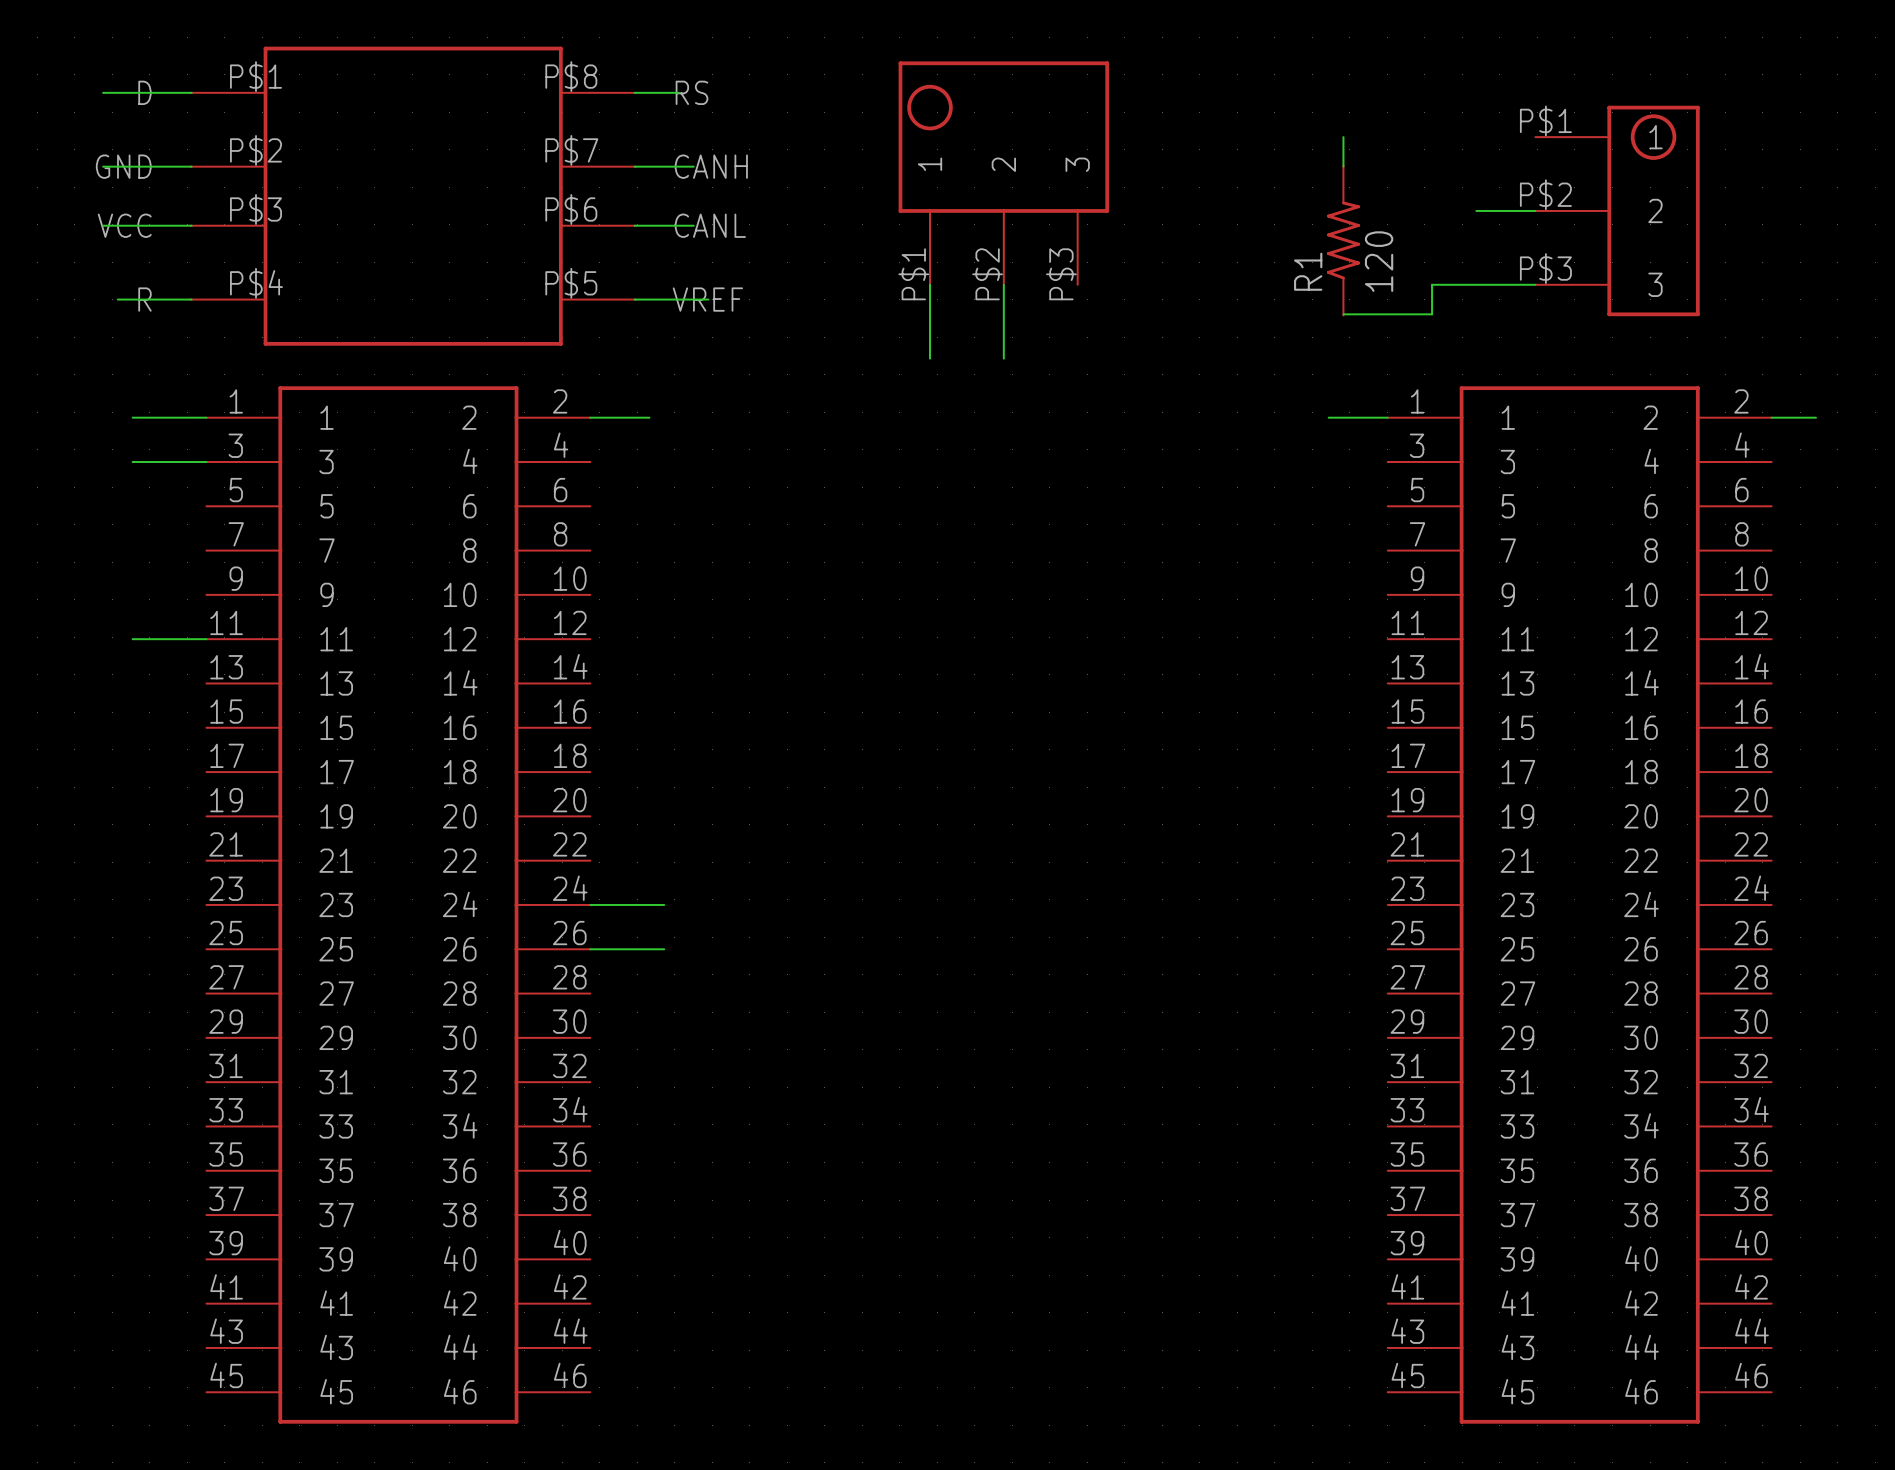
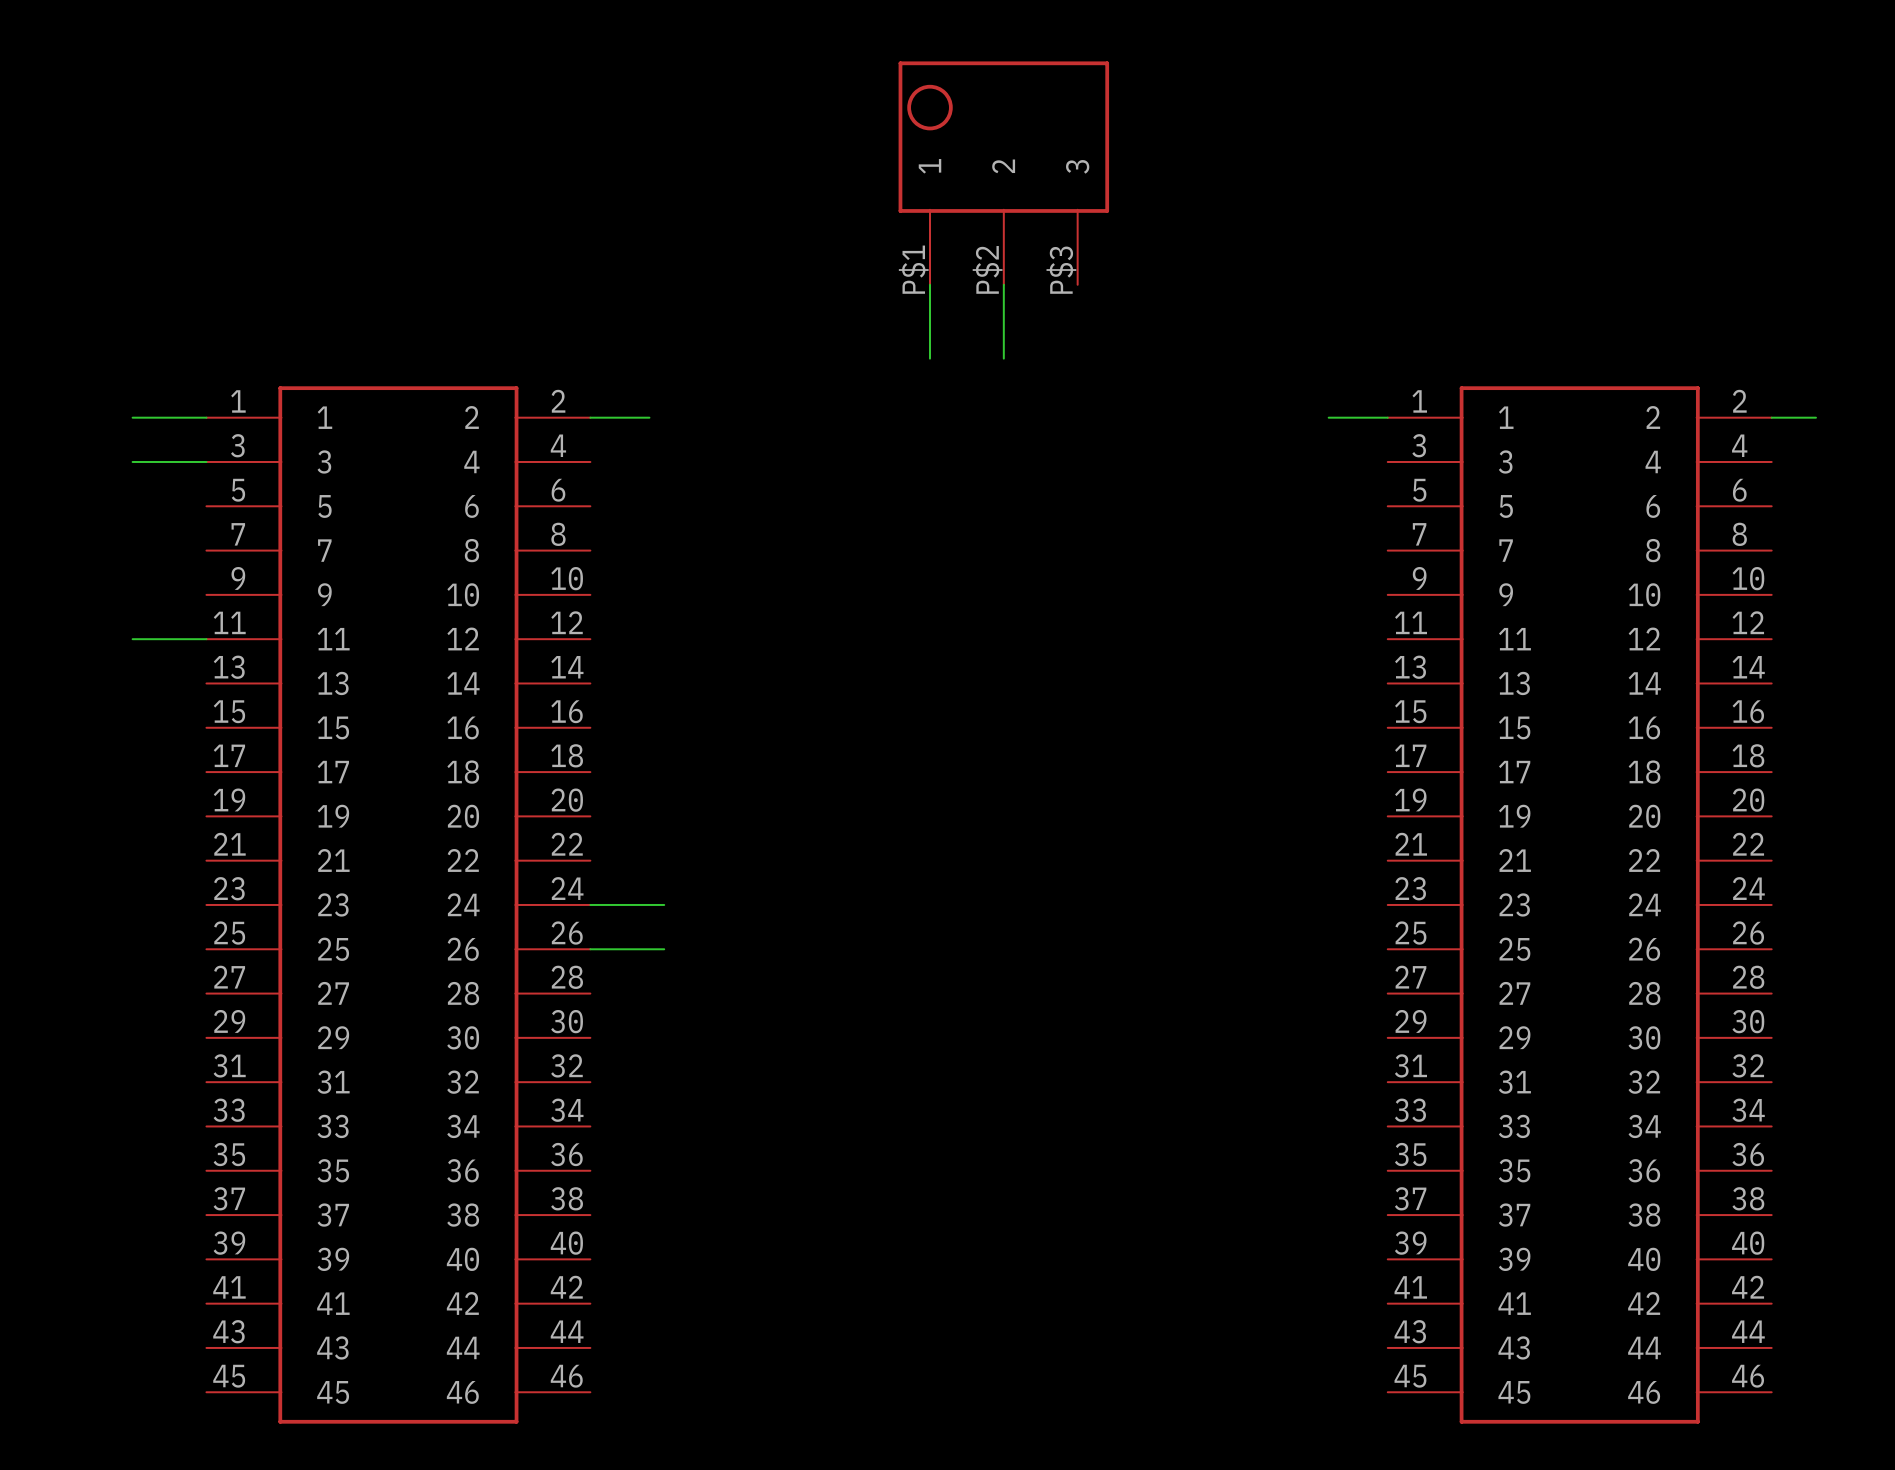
wire: (103, 92) (191, 92) -> none
wire: (634, 92) (678, 92) -> none
wire: (1343, 137) (1343, 166) -> none
wire: (103, 166) (191, 166) -> none
wire: (634, 166) (693, 166) -> none
part: (413, 196) -> none
wire: (1476, 210) (1535, 210) -> none
part: (1617, 210) -> none
wire: (103, 225) (191, 225) -> none
wire: (634, 225) (693, 225) -> none
R1: 120 (1343, 240) -> none
wire: (1535, 284) (1432, 284) (1432, 314) (1343, 314) -> none
wire: (117, 299) (191, 299) -> none
wire: (634, 299) (708, 299) -> none

